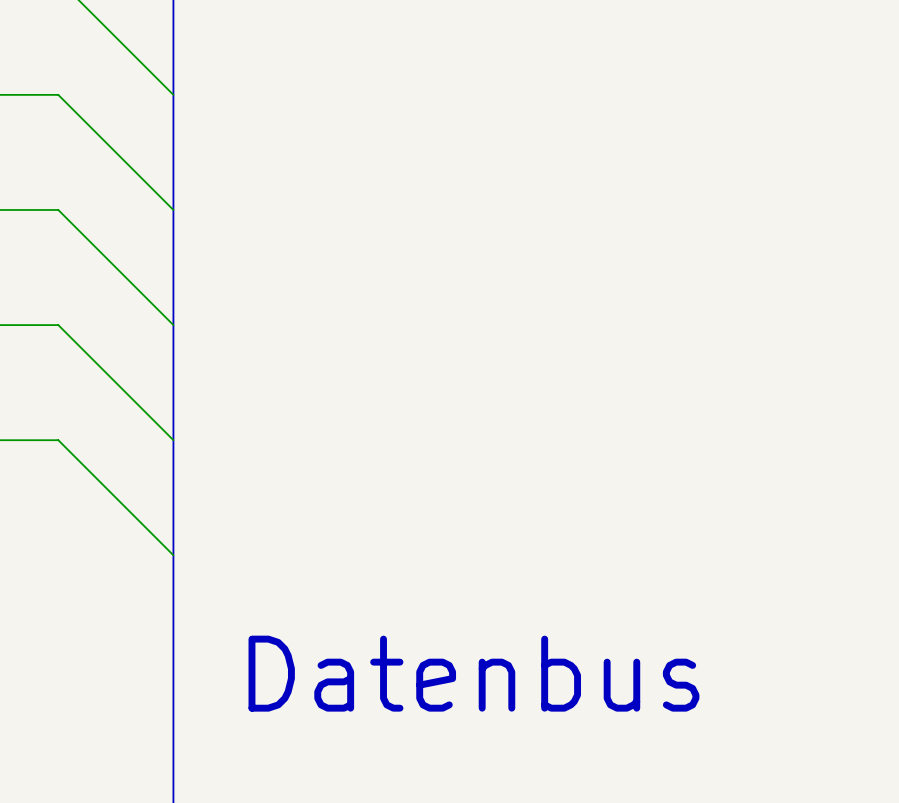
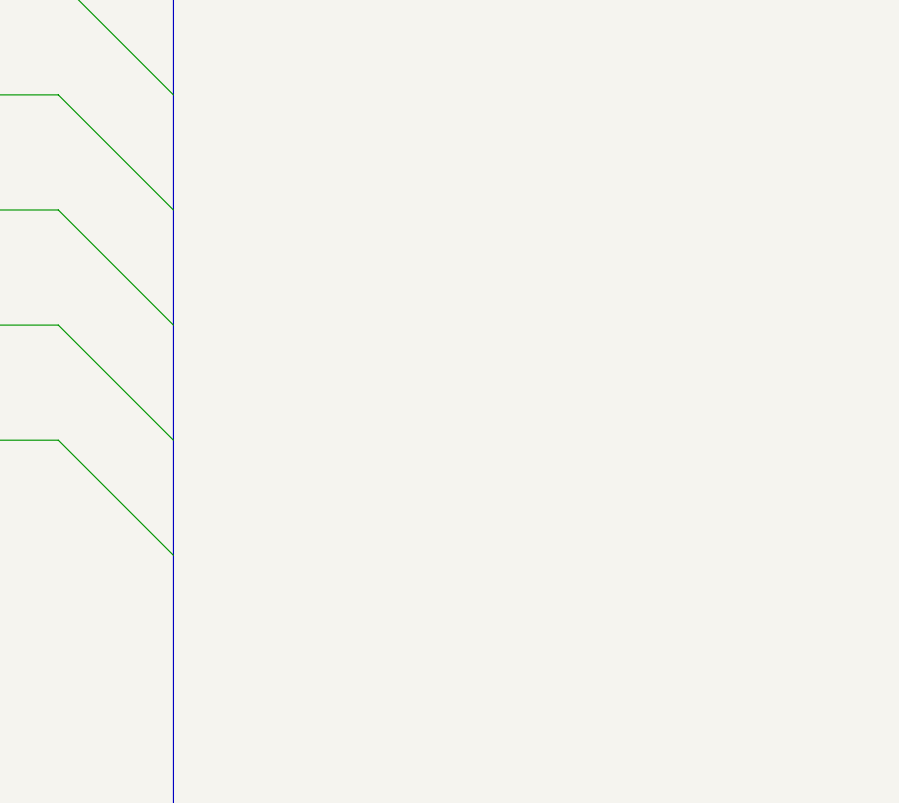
text: Datenbus (473, 673) -> none

